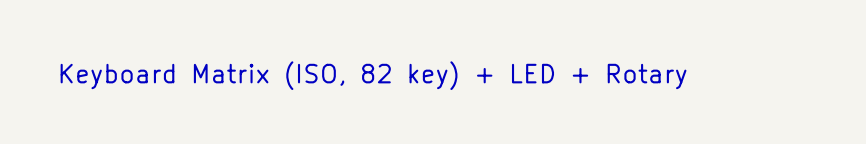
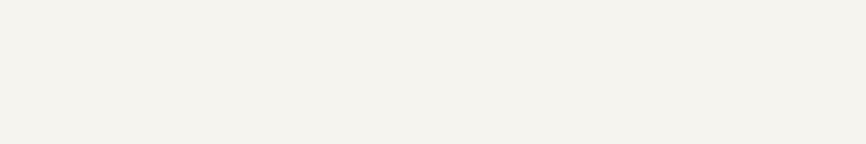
text: Keyboard Matrix (ISO, 82 key) + LED + Rotary (373, 75) -> none

